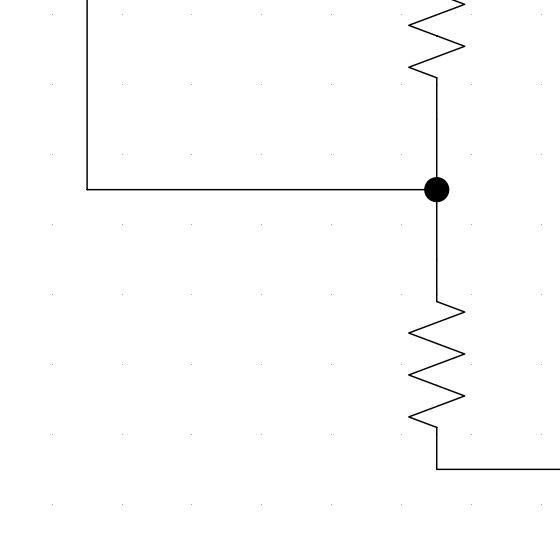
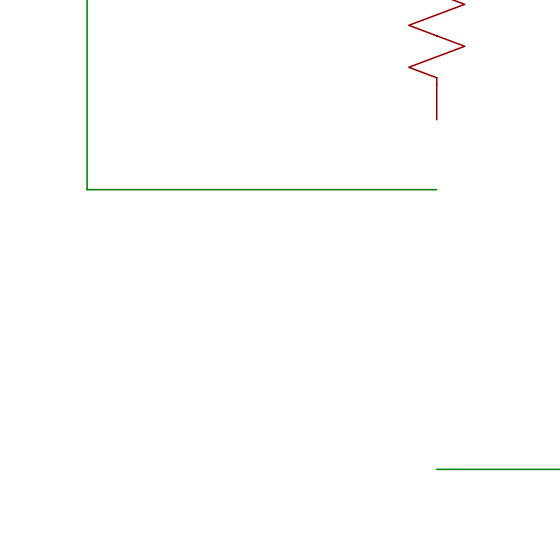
wire: (436, 119) (436, 259) -> none
junction: (436, 189) -> none
part: (436, 364) -> none

